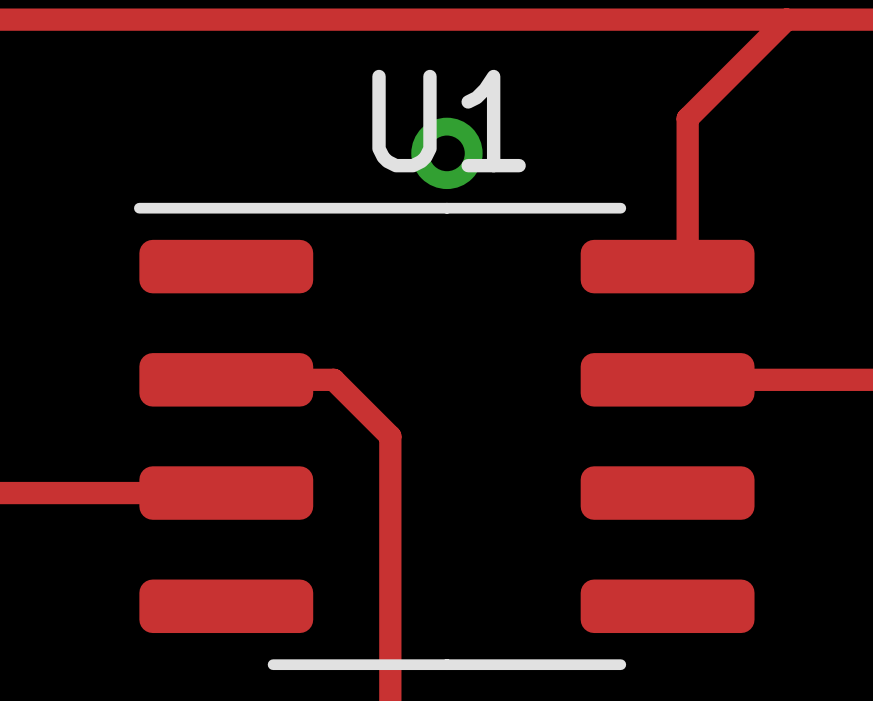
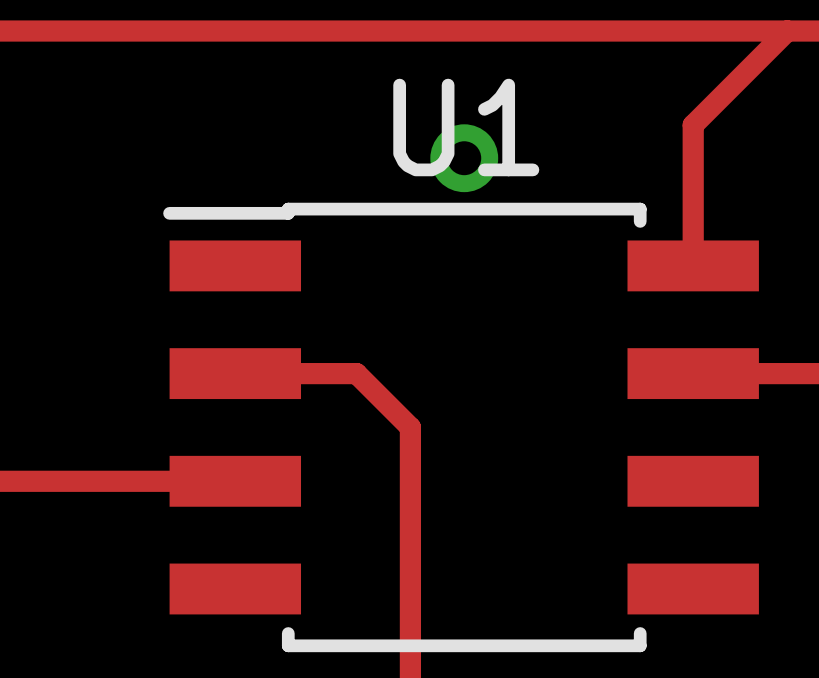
U1 footprint: [134, 202, 755, 671] -> [163, 202, 759, 653]

